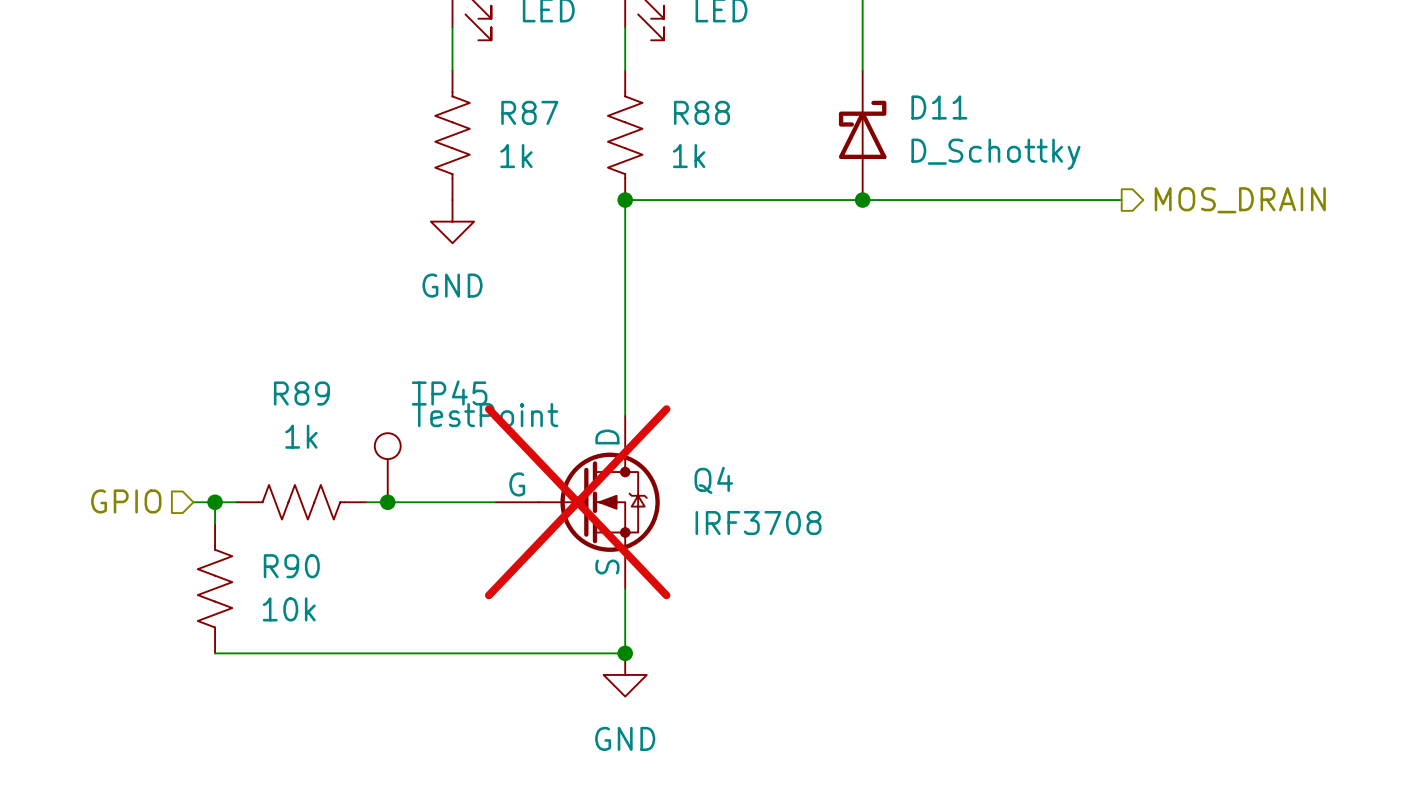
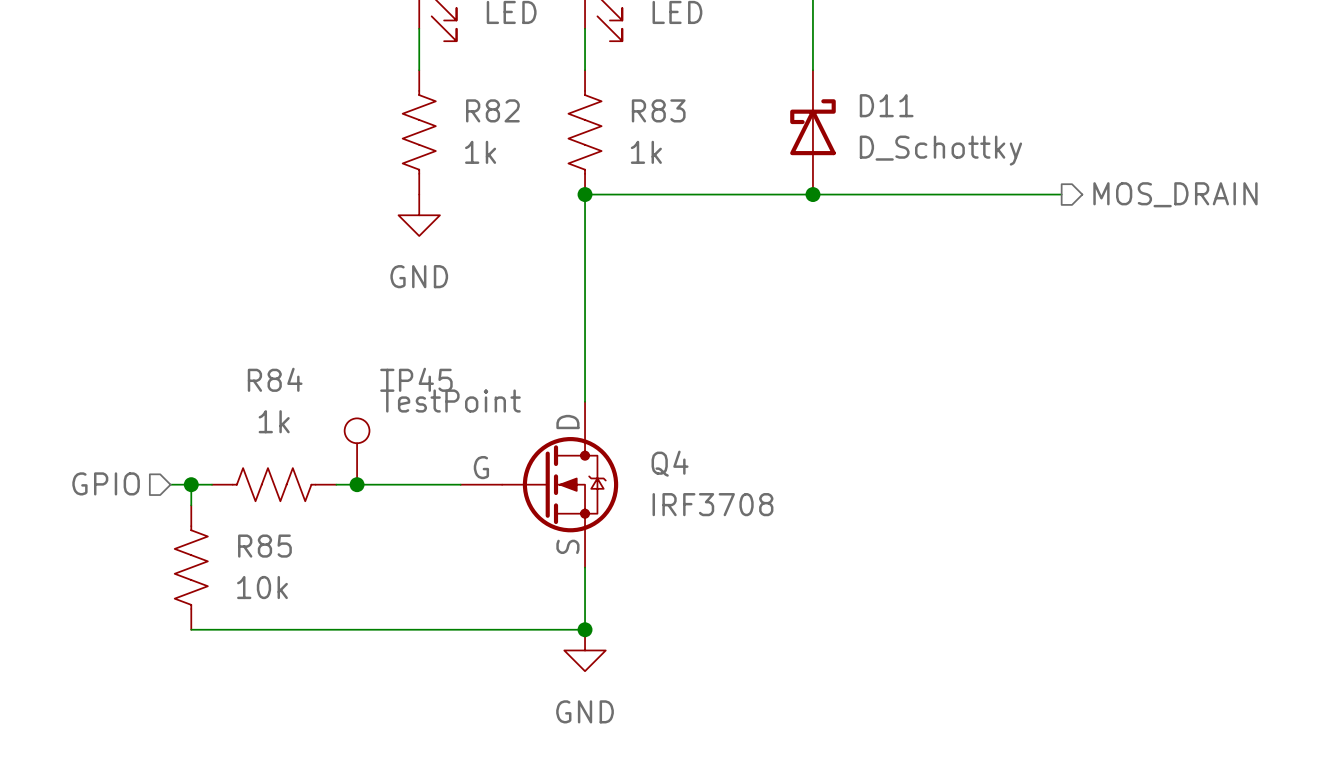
R87 name: R87 (529, 112) -> R82 (492, 110)
R88 name: R88 (701, 112) -> R83 (658, 110)
R89 name: R89 (301, 393) -> R84 (275, 379)
Q4 do-not-place cross: (577, 502) -> none
R90 name: R90 (291, 566) -> R85 (264, 546)

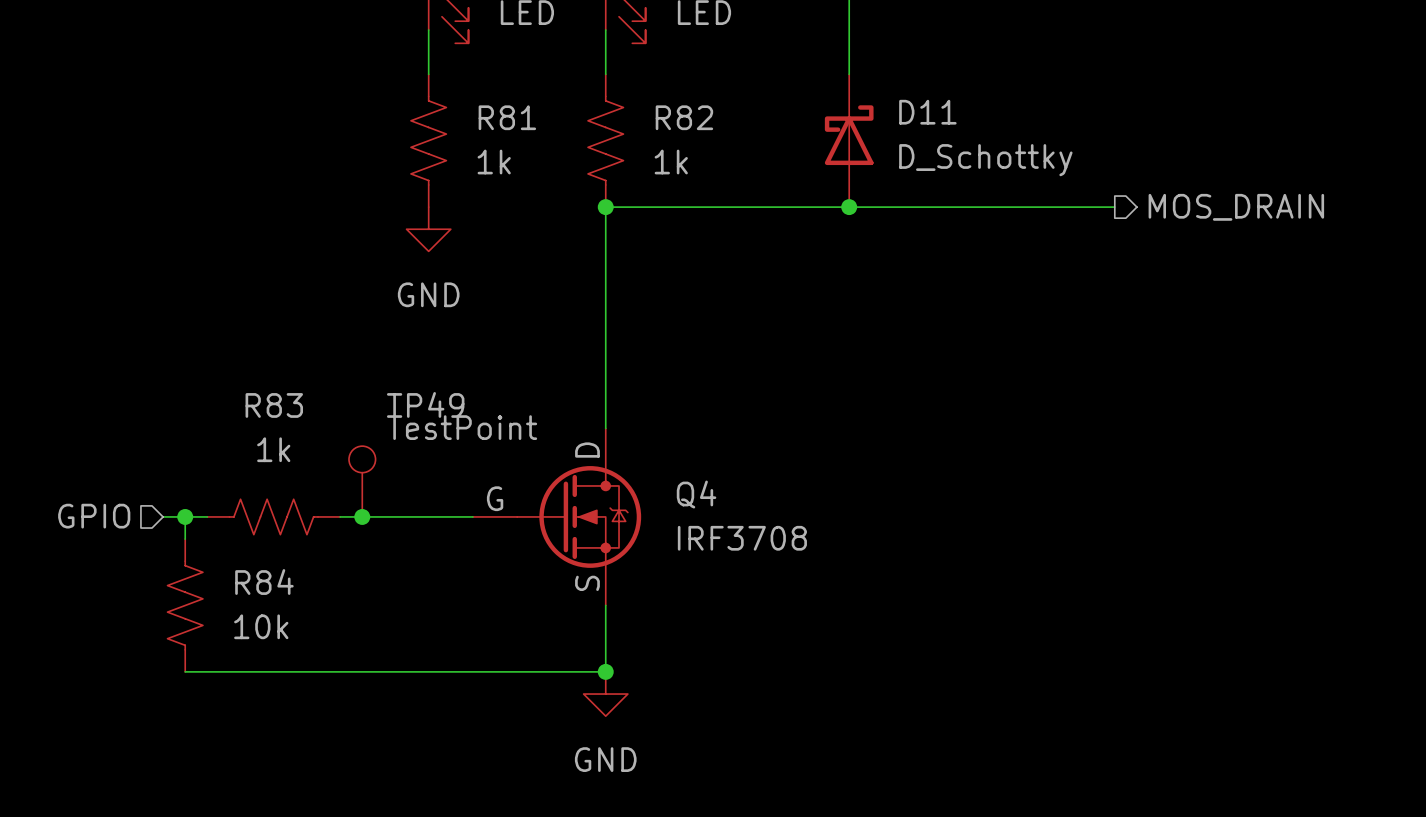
R82 name: R82 (492, 110) -> R81 (507, 117)
R83 name: R83 (658, 110) -> R82 (684, 117)
R84 name: R84 (275, 379) -> R83 (274, 405)
TP45 name: TP45 (416, 379) -> TP49 (425, 404)
R85 name: R85 (264, 546) -> R84 (264, 582)

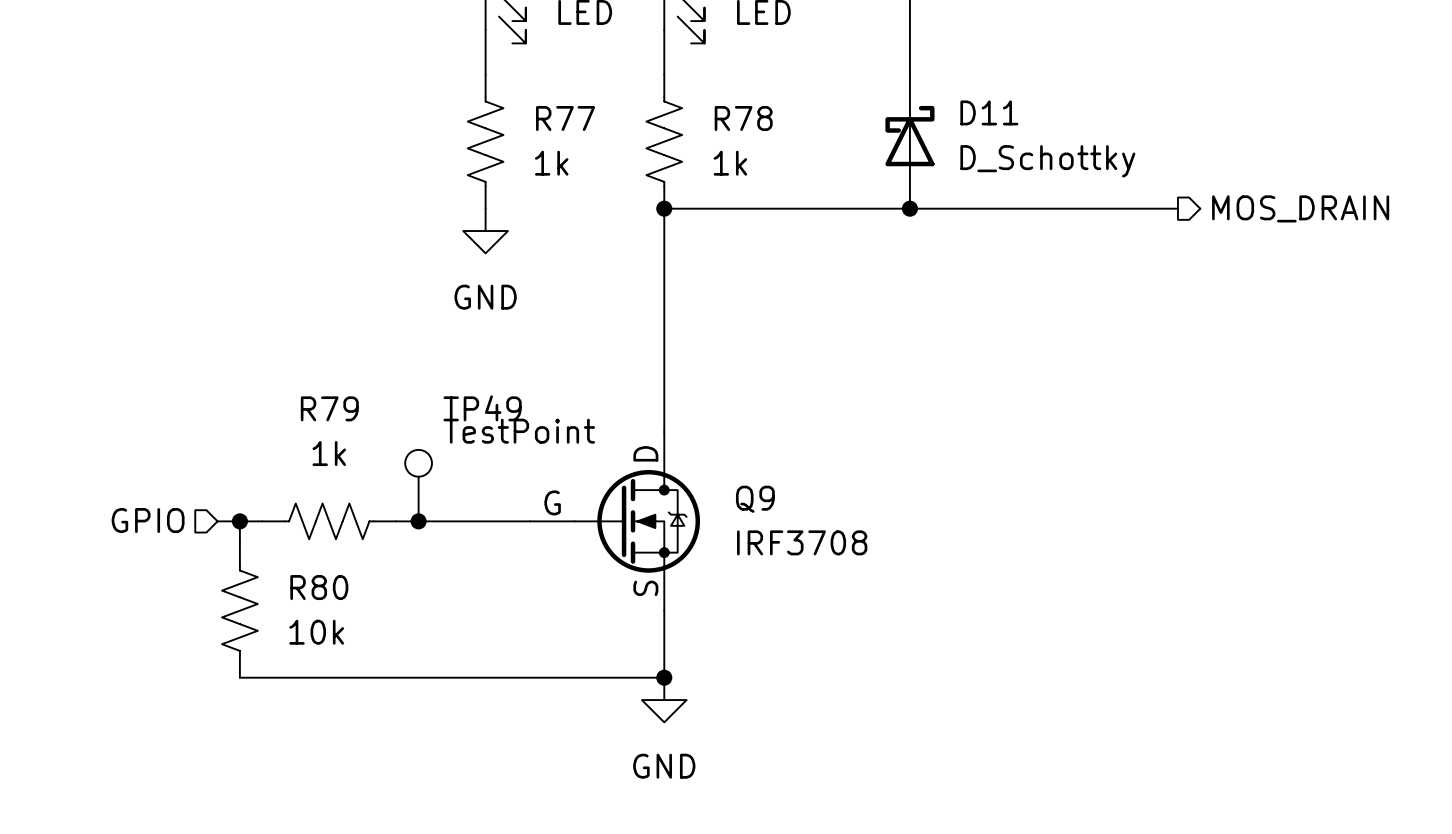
R81 name: R81 (507, 117) -> R77 (565, 118)
R82 name: R82 (684, 117) -> R78 (743, 118)
R83 name: R83 (274, 405) -> R79 (329, 408)
Q4 name: Q4 (696, 494) -> Q9 (755, 499)
R84 name: R84 (264, 582) -> R80 (319, 587)

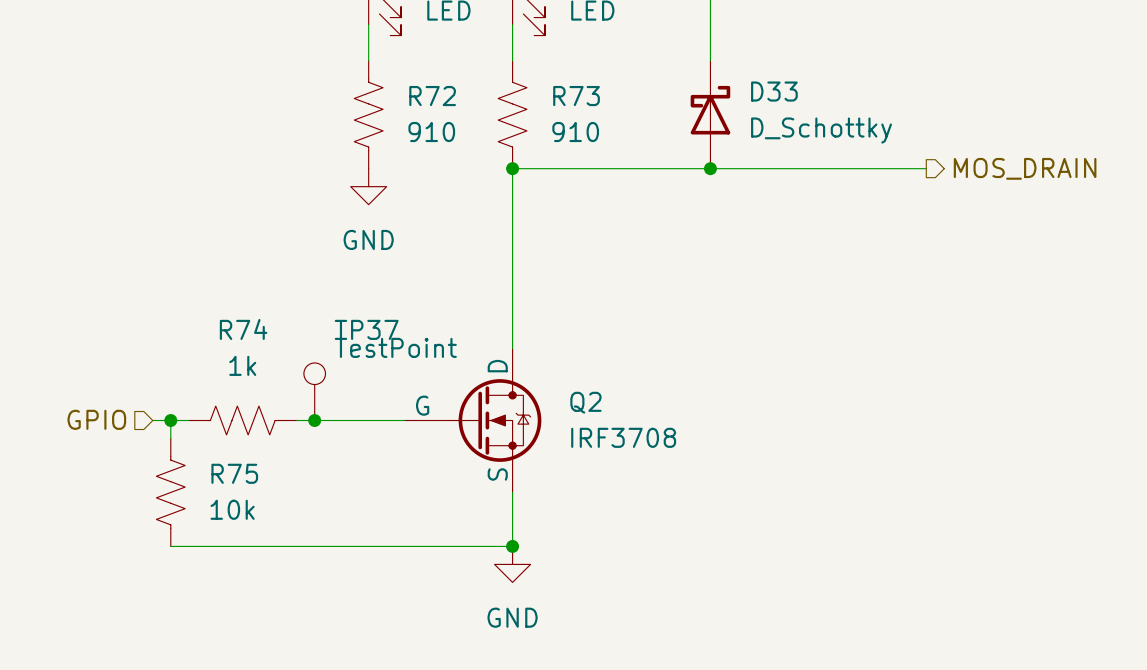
D11 name: D11 (989, 112) -> D33 (774, 91)
R77 name: R77 (565, 118) -> R72 (432, 96)
R78 name: R78 (743, 118) -> R73 (576, 96)
R77 value: 1k (551, 163) -> 910 (431, 132)
R78 value: 1k (730, 163) -> 910 (575, 132)
R79 name: R79 (329, 408) -> R74 (243, 329)
TP49 name: TP49 (482, 408) -> TP37 (366, 329)
Q9 name: Q9 (755, 499) -> Q2 (585, 402)
R80 name: R80 (319, 587) -> R75 (234, 473)

